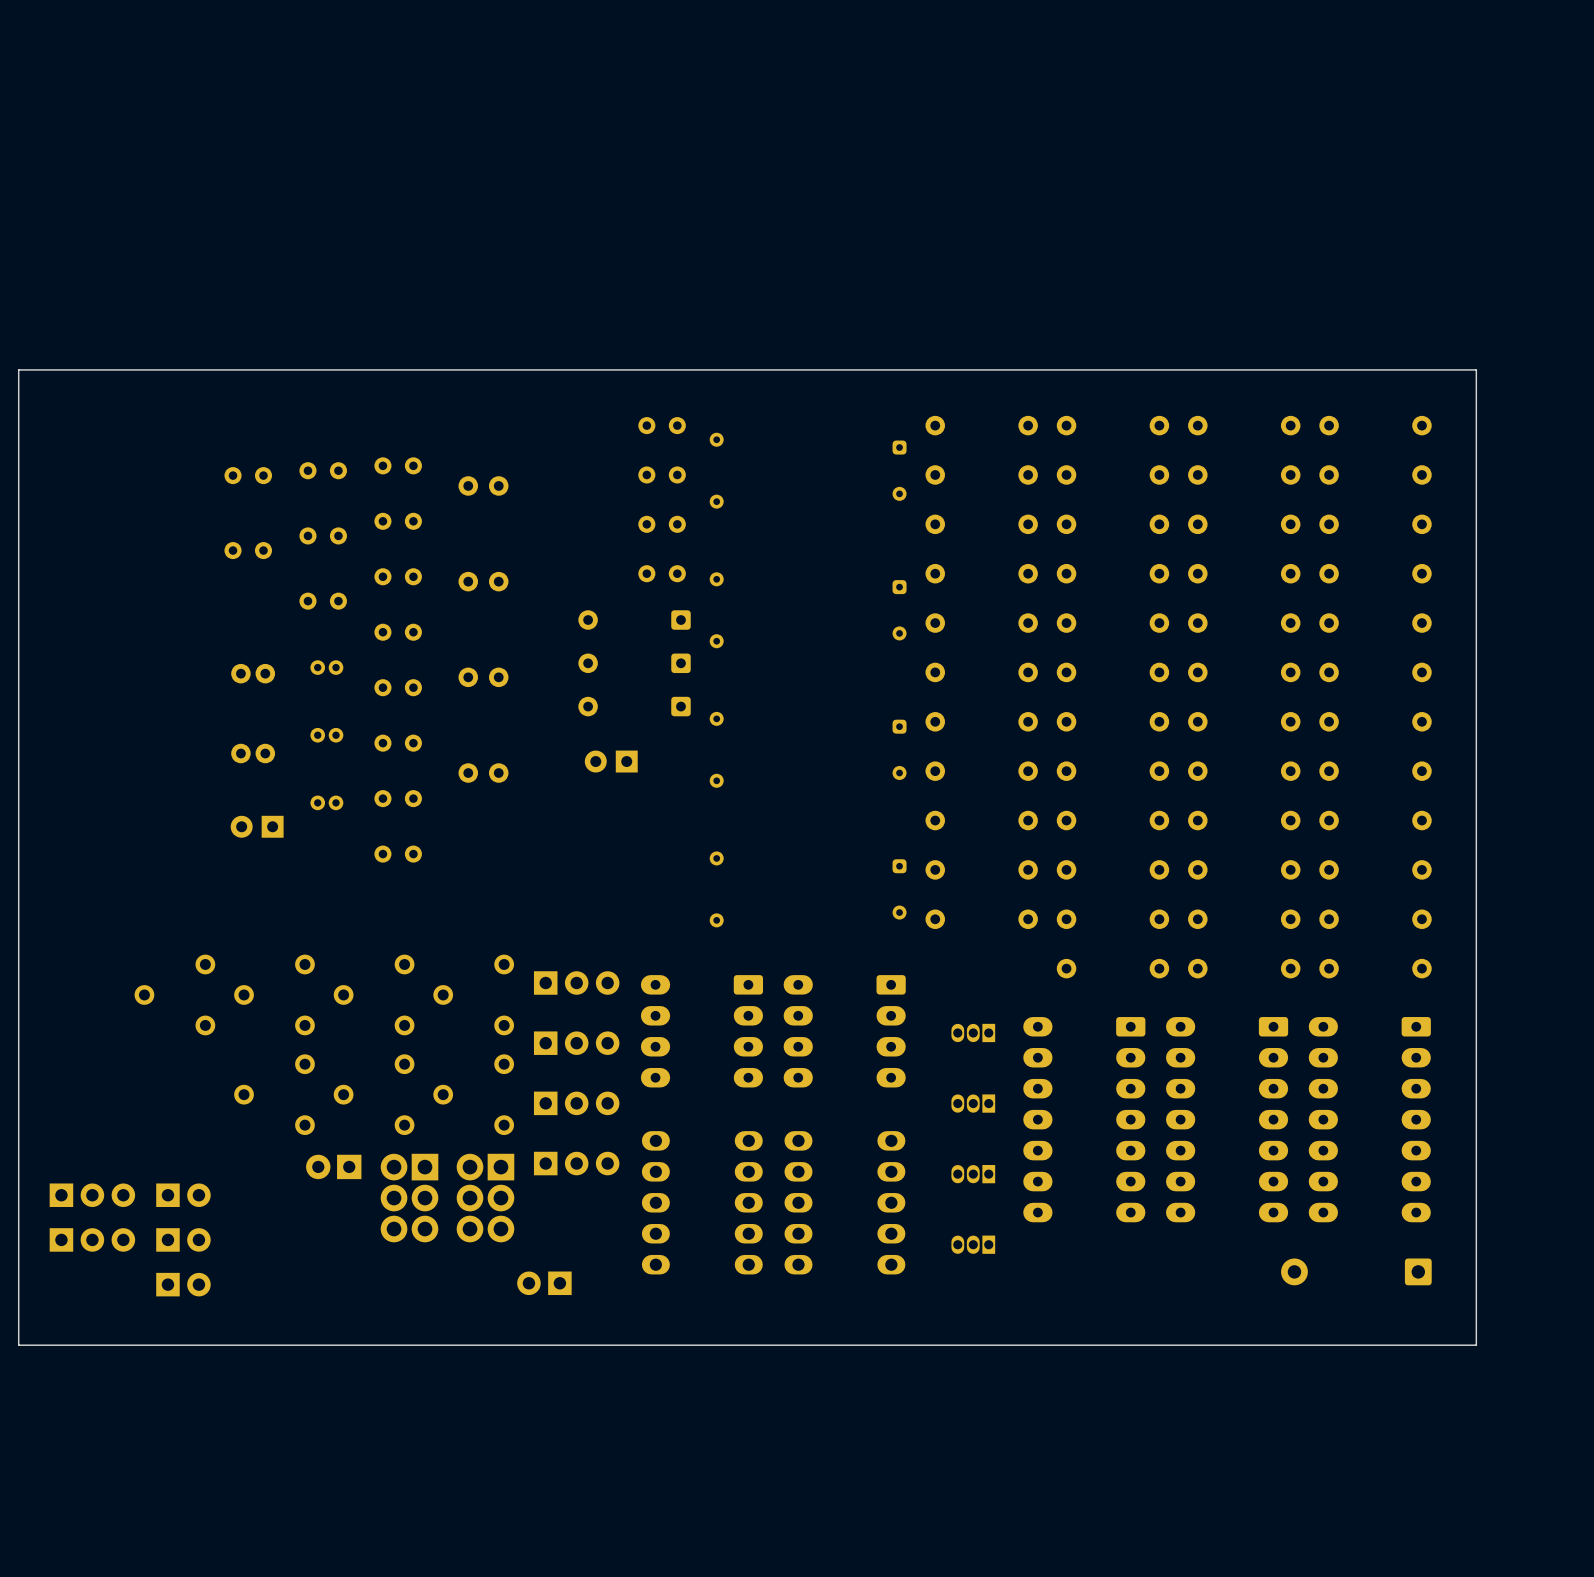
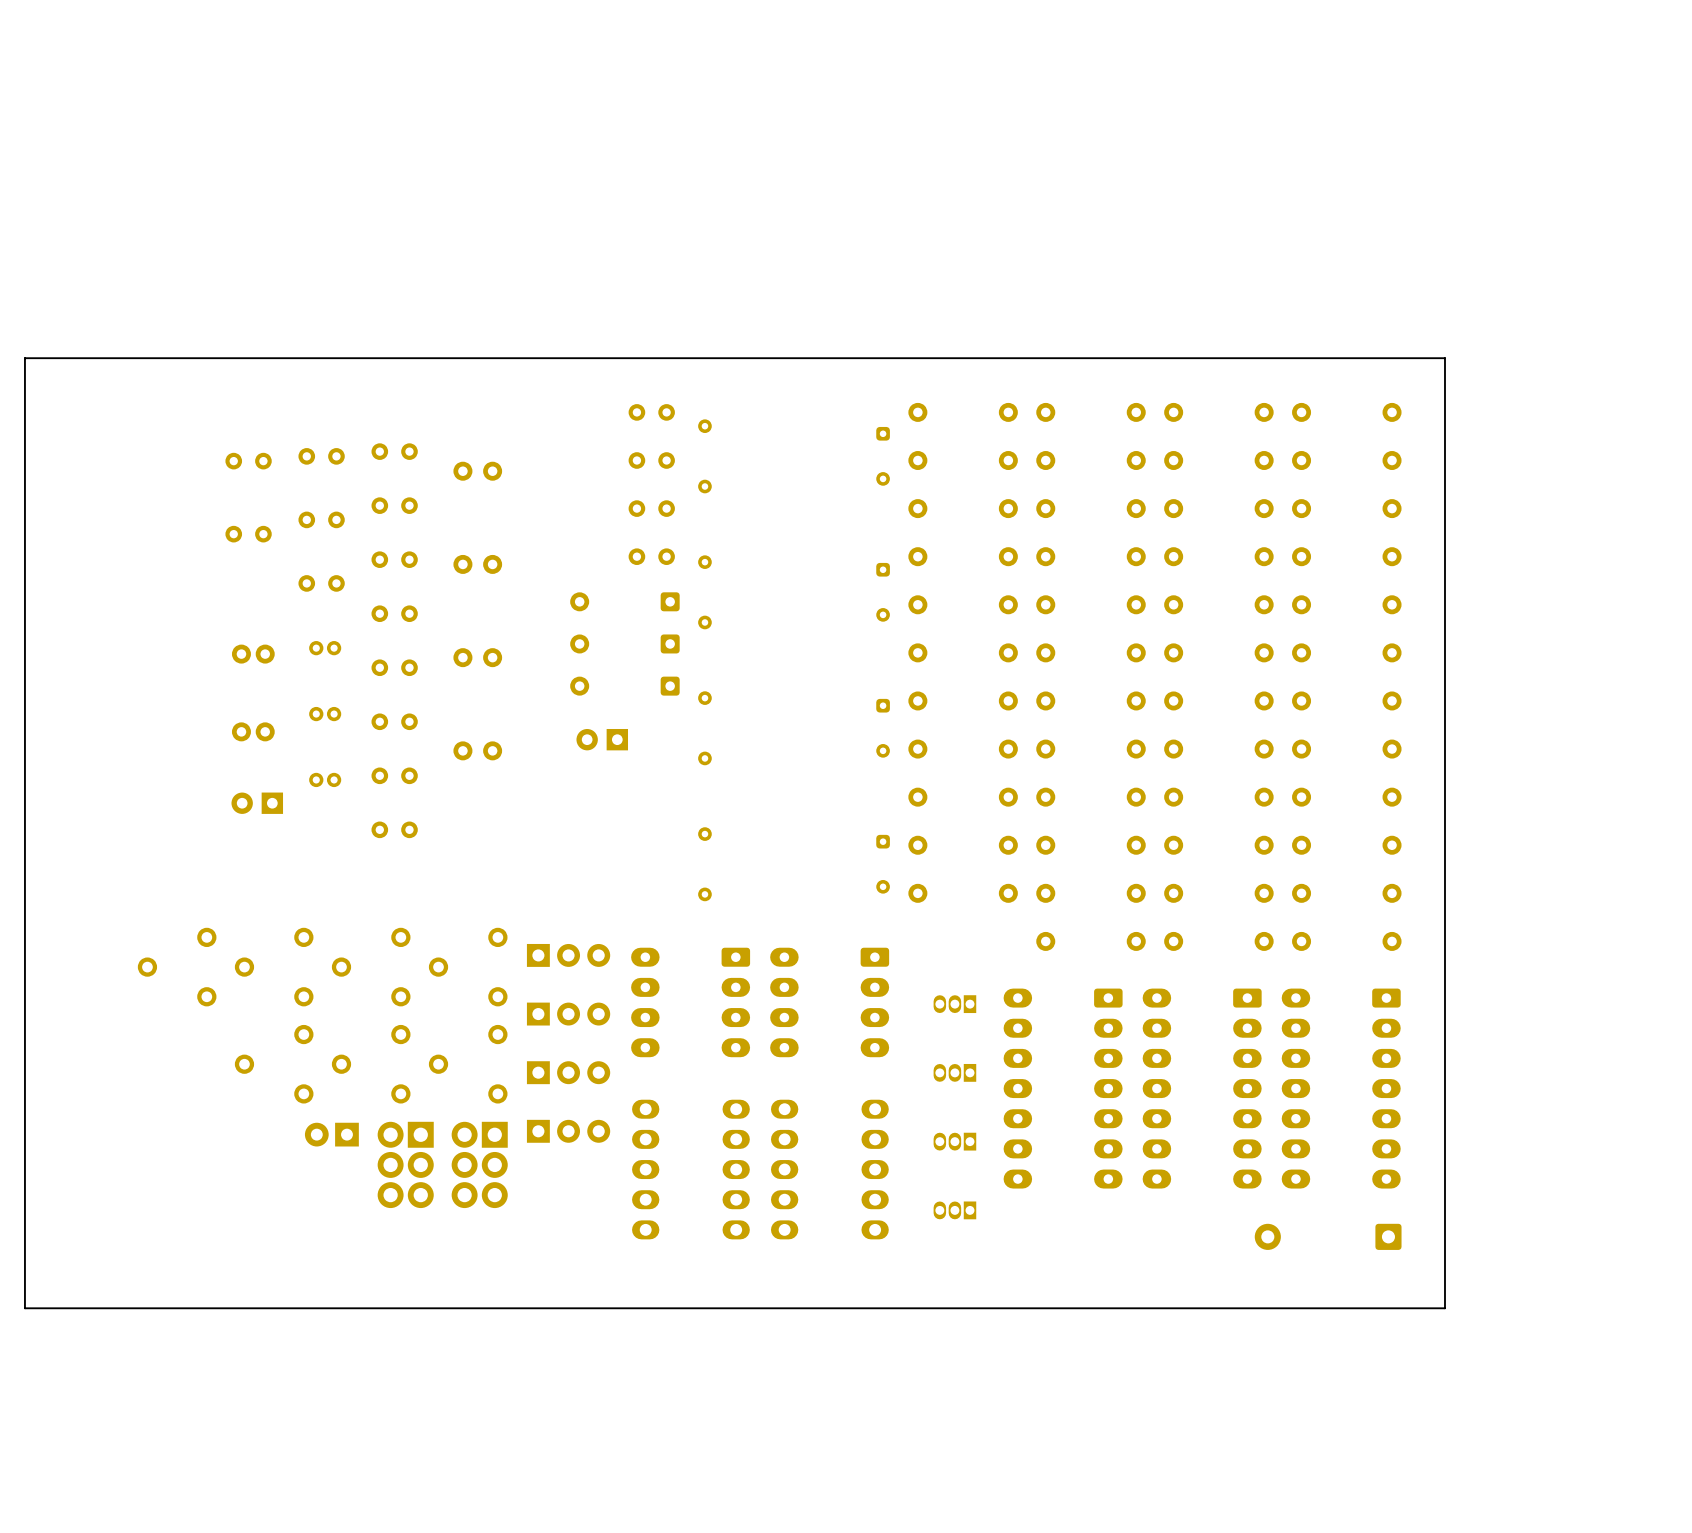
part: (92, 1195) -> none
part: (183, 1195) -> none
part: (92, 1239) -> none
part: (183, 1239) -> none
part: (544, 1283) -> none
part: (183, 1284) -> none

